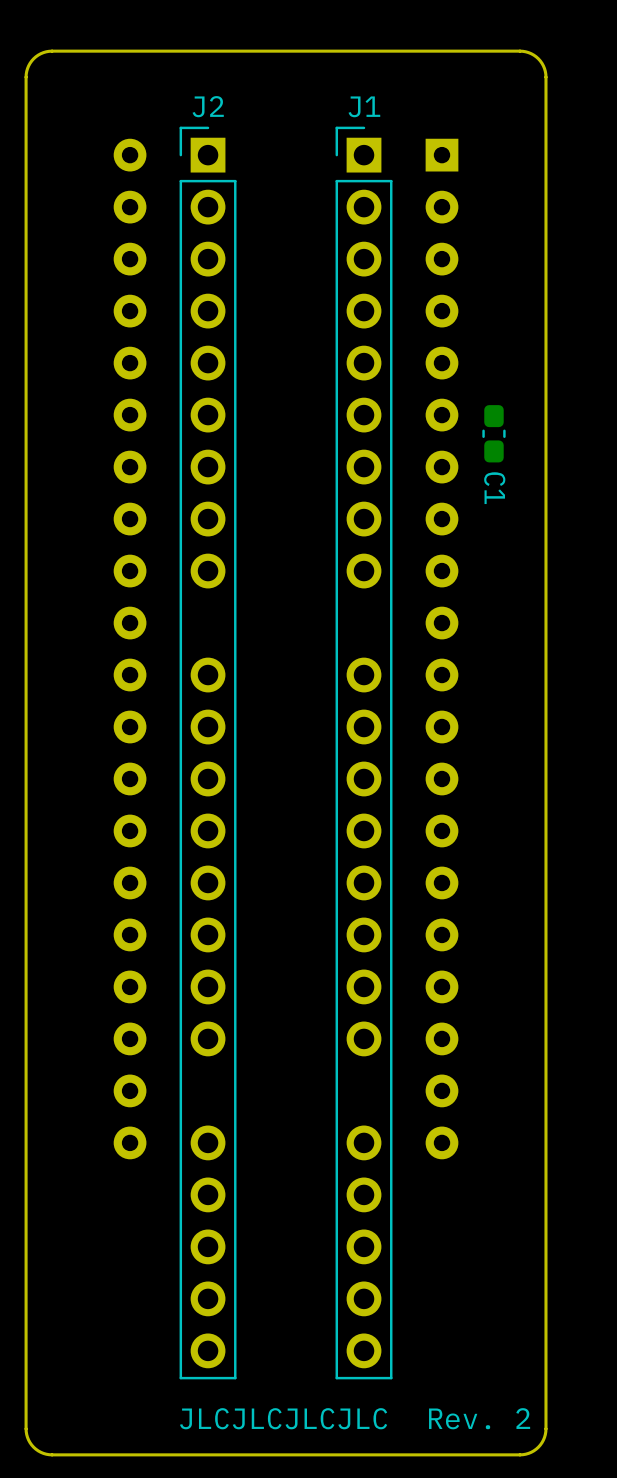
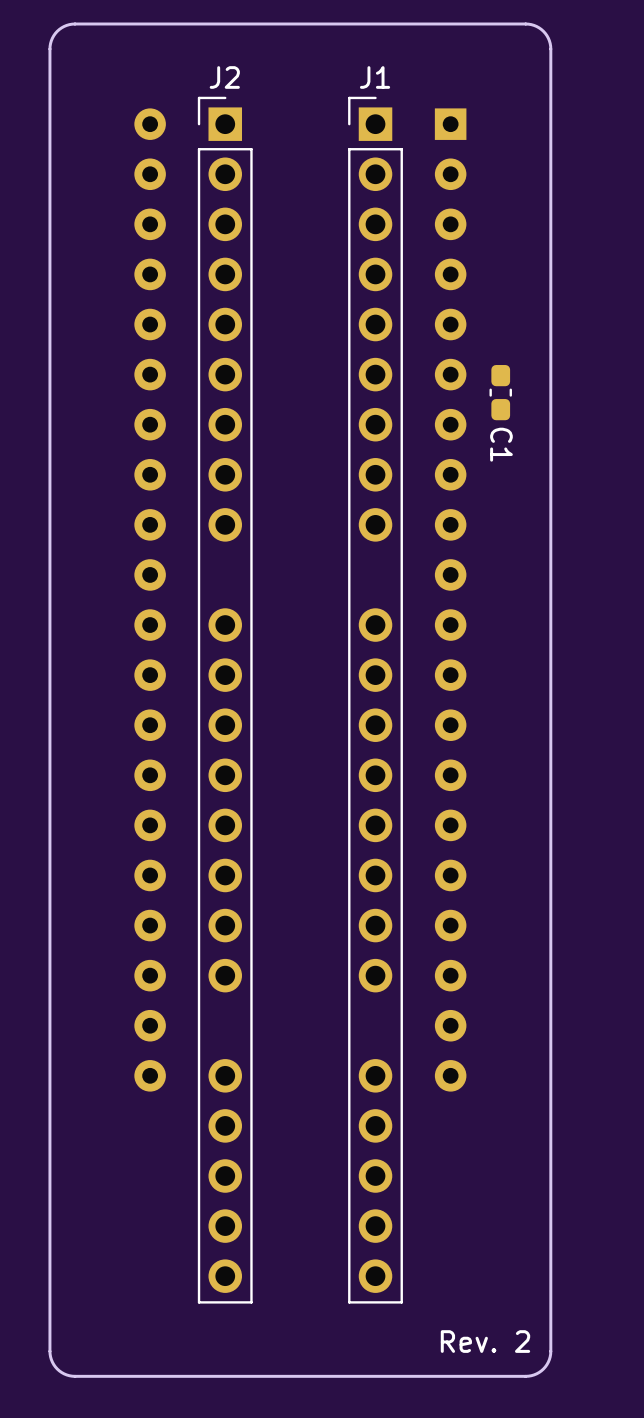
text: JLCJLCJLCJLC (283, 1418) -> none

